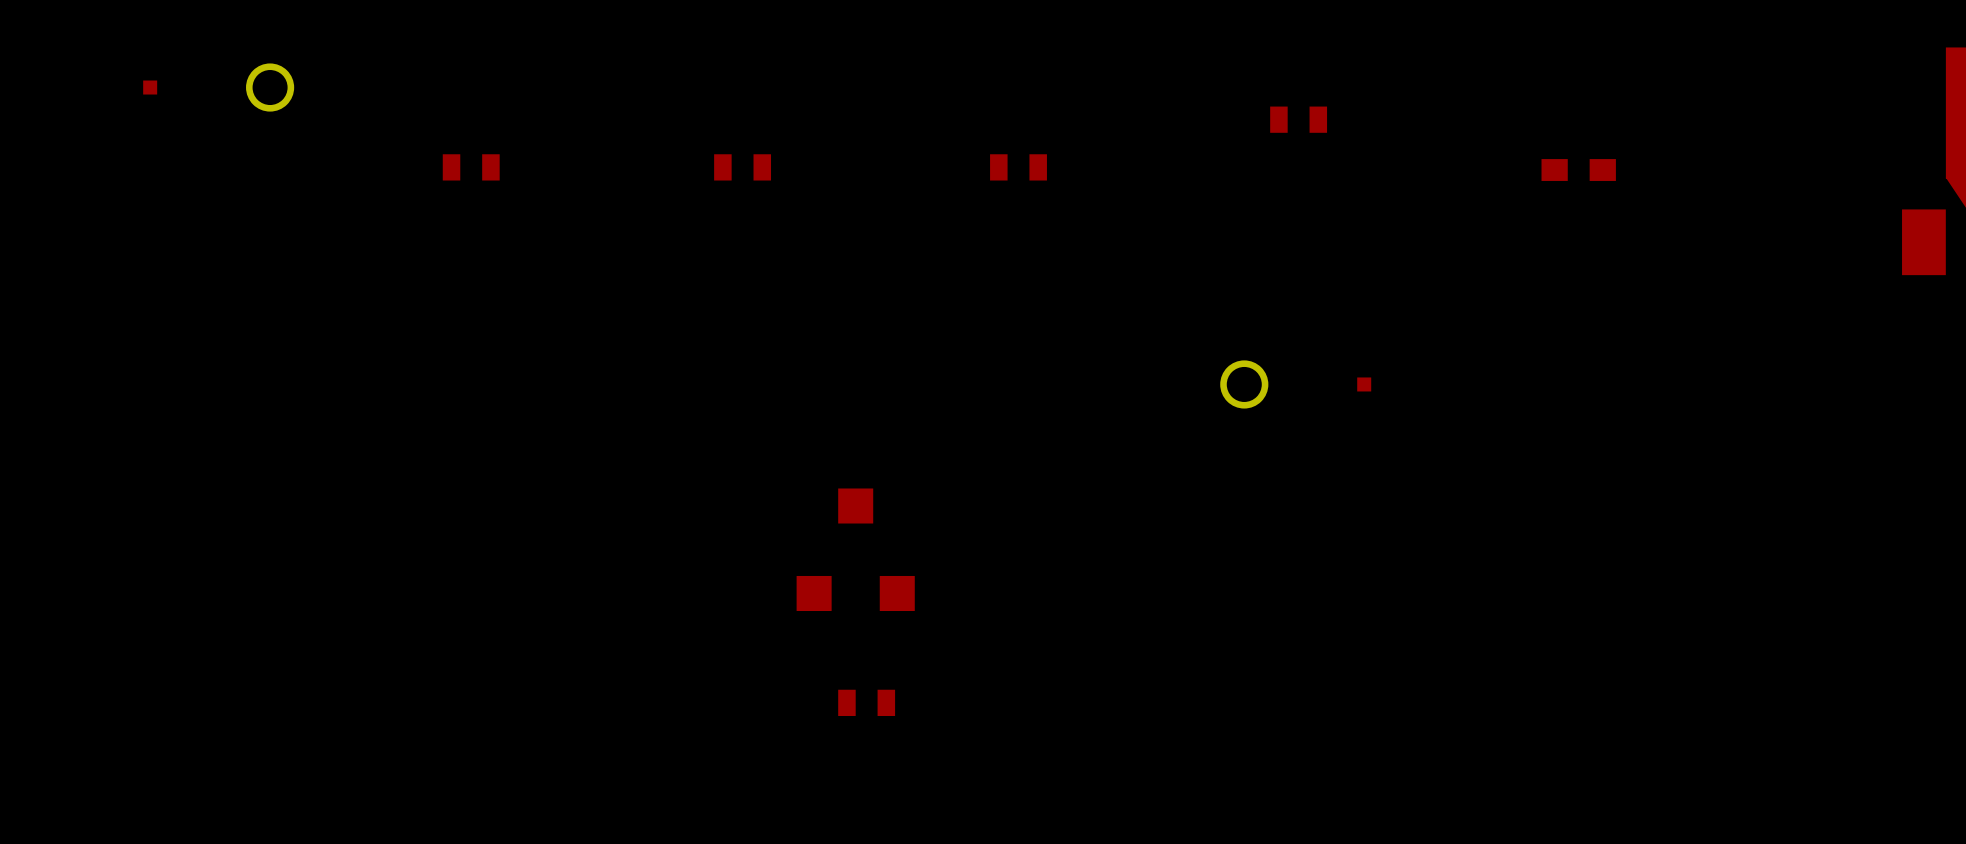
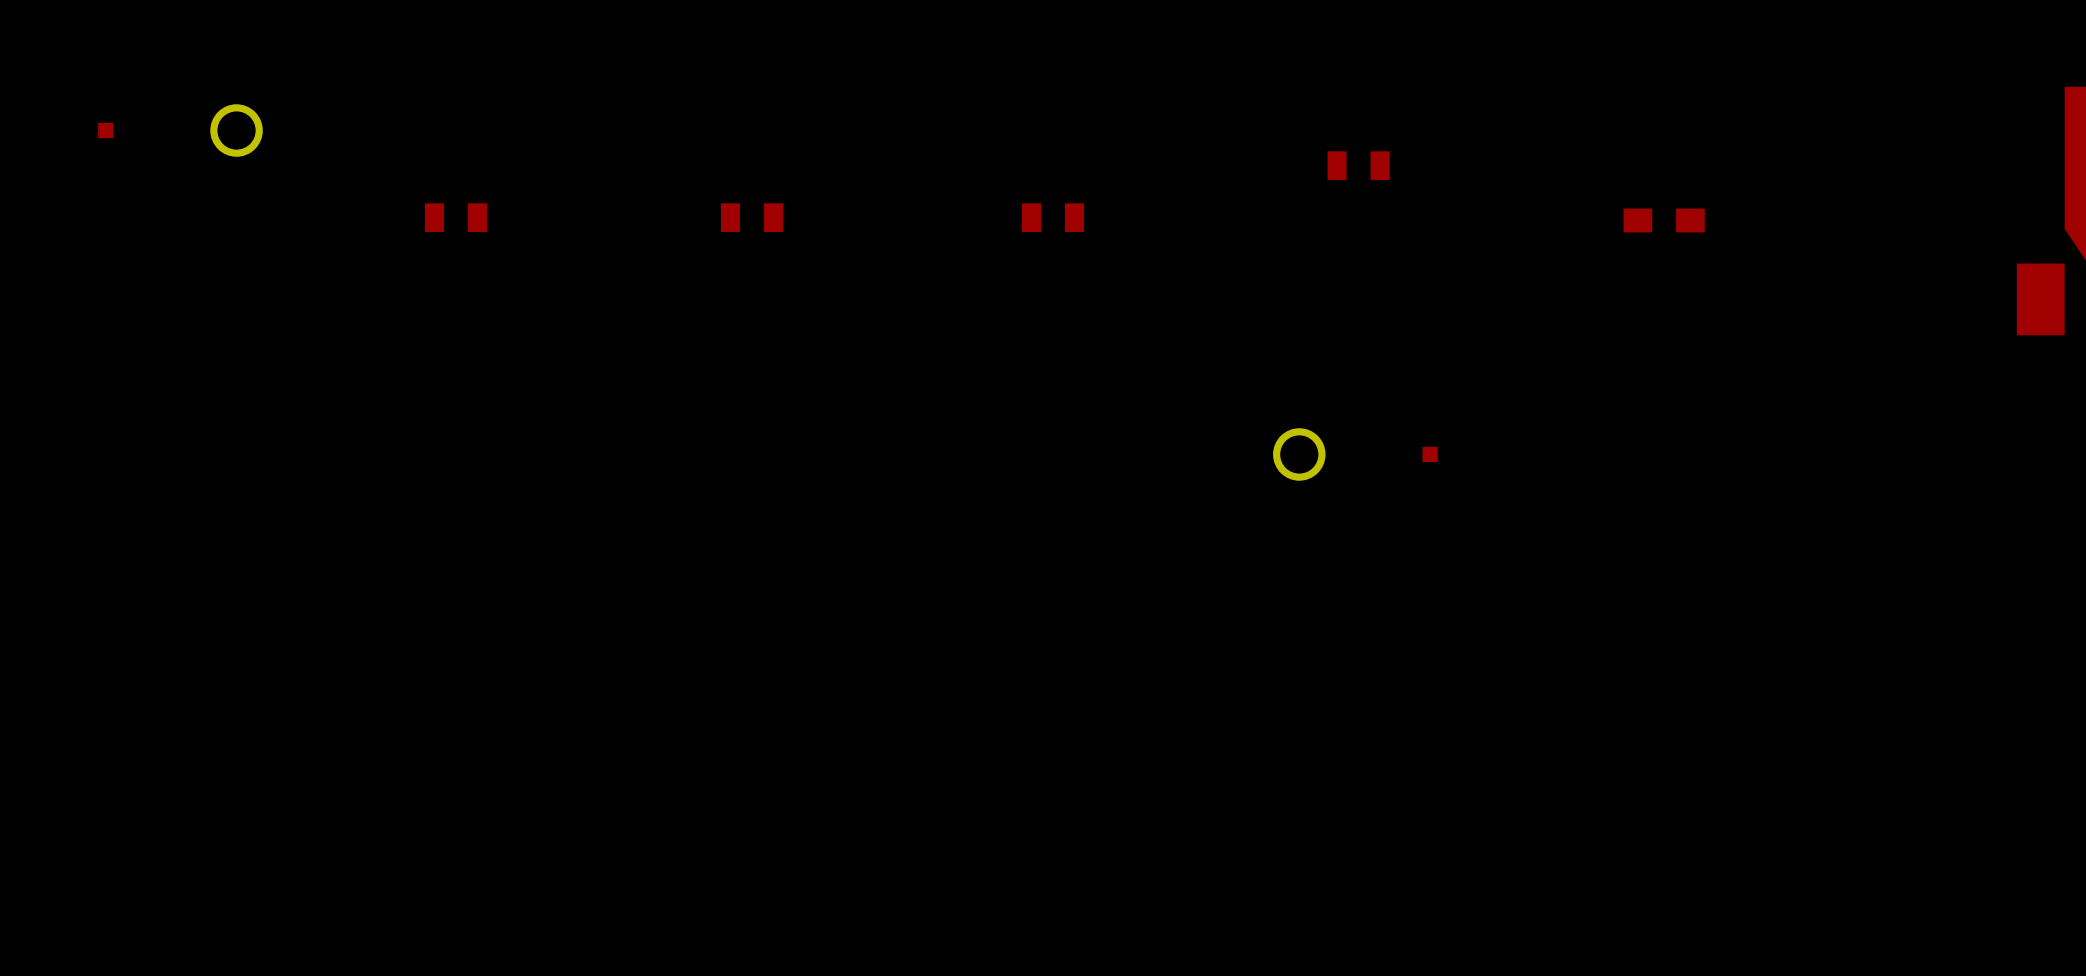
part: (855, 549) -> none
part: (866, 702) -> none

